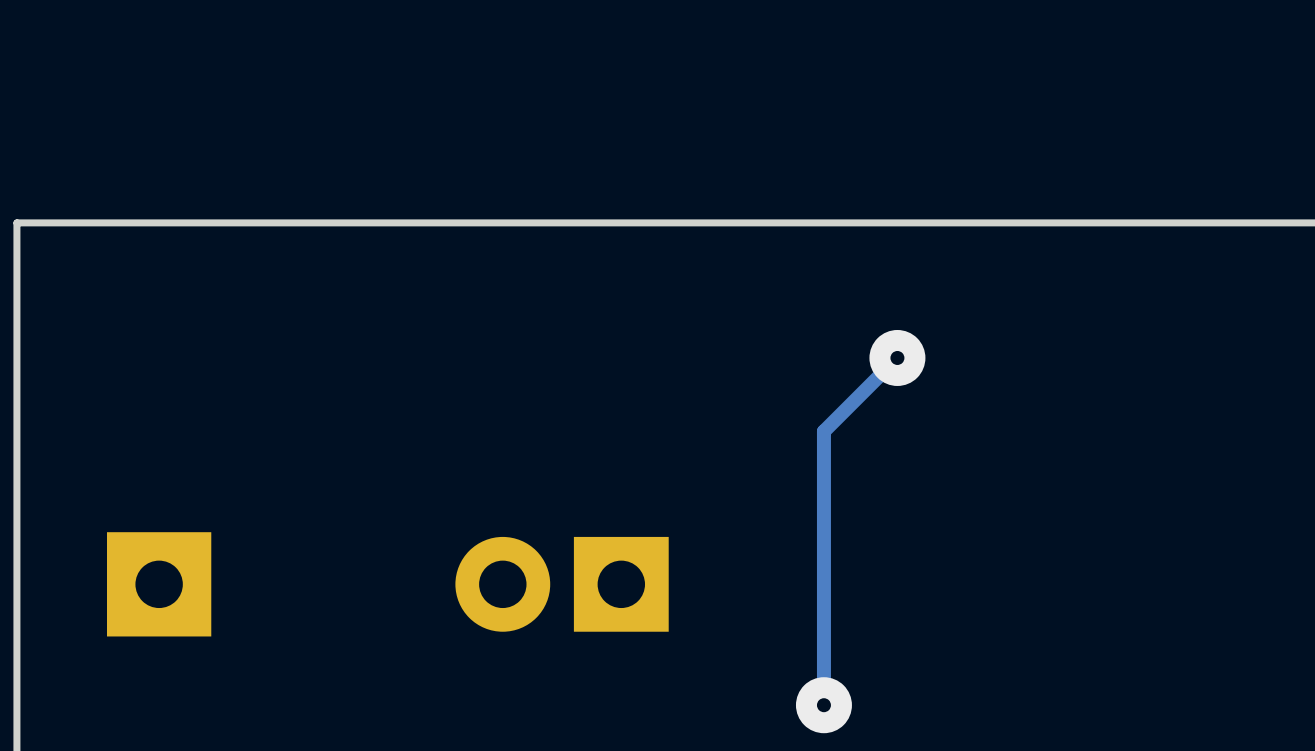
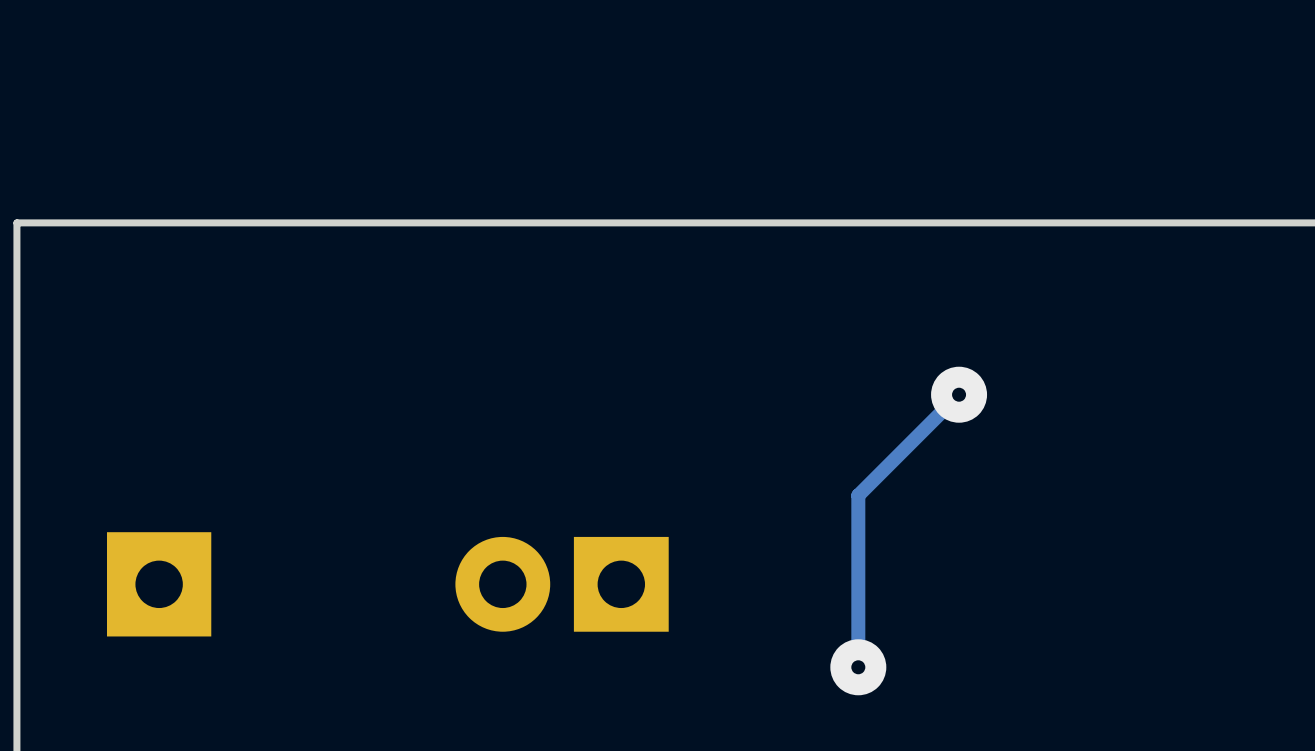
track: (897, 357) (823, 431) (823, 705) -> none
via position: (897, 357) -> (959, 394)
track: none -> (959, 394) (858, 495) (858, 667)
via position: (823, 705) -> (858, 667)

